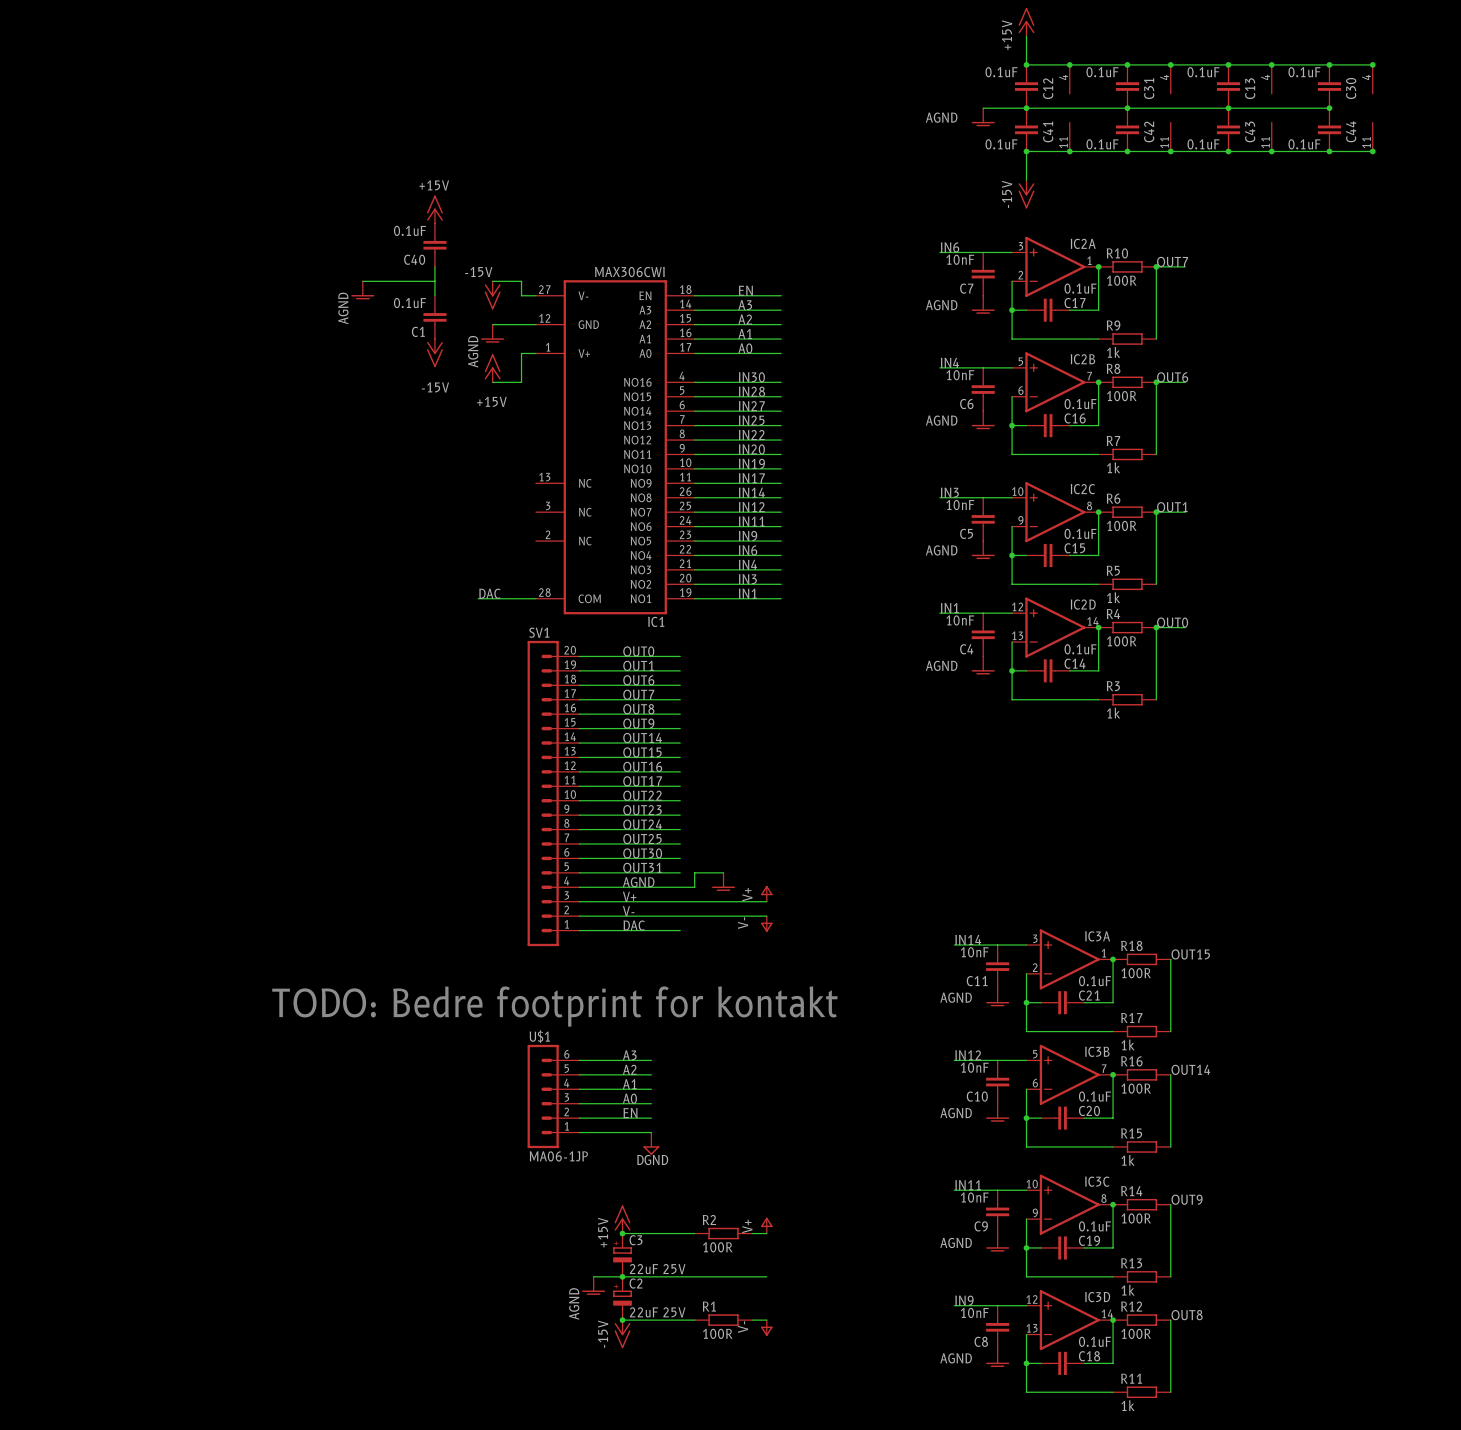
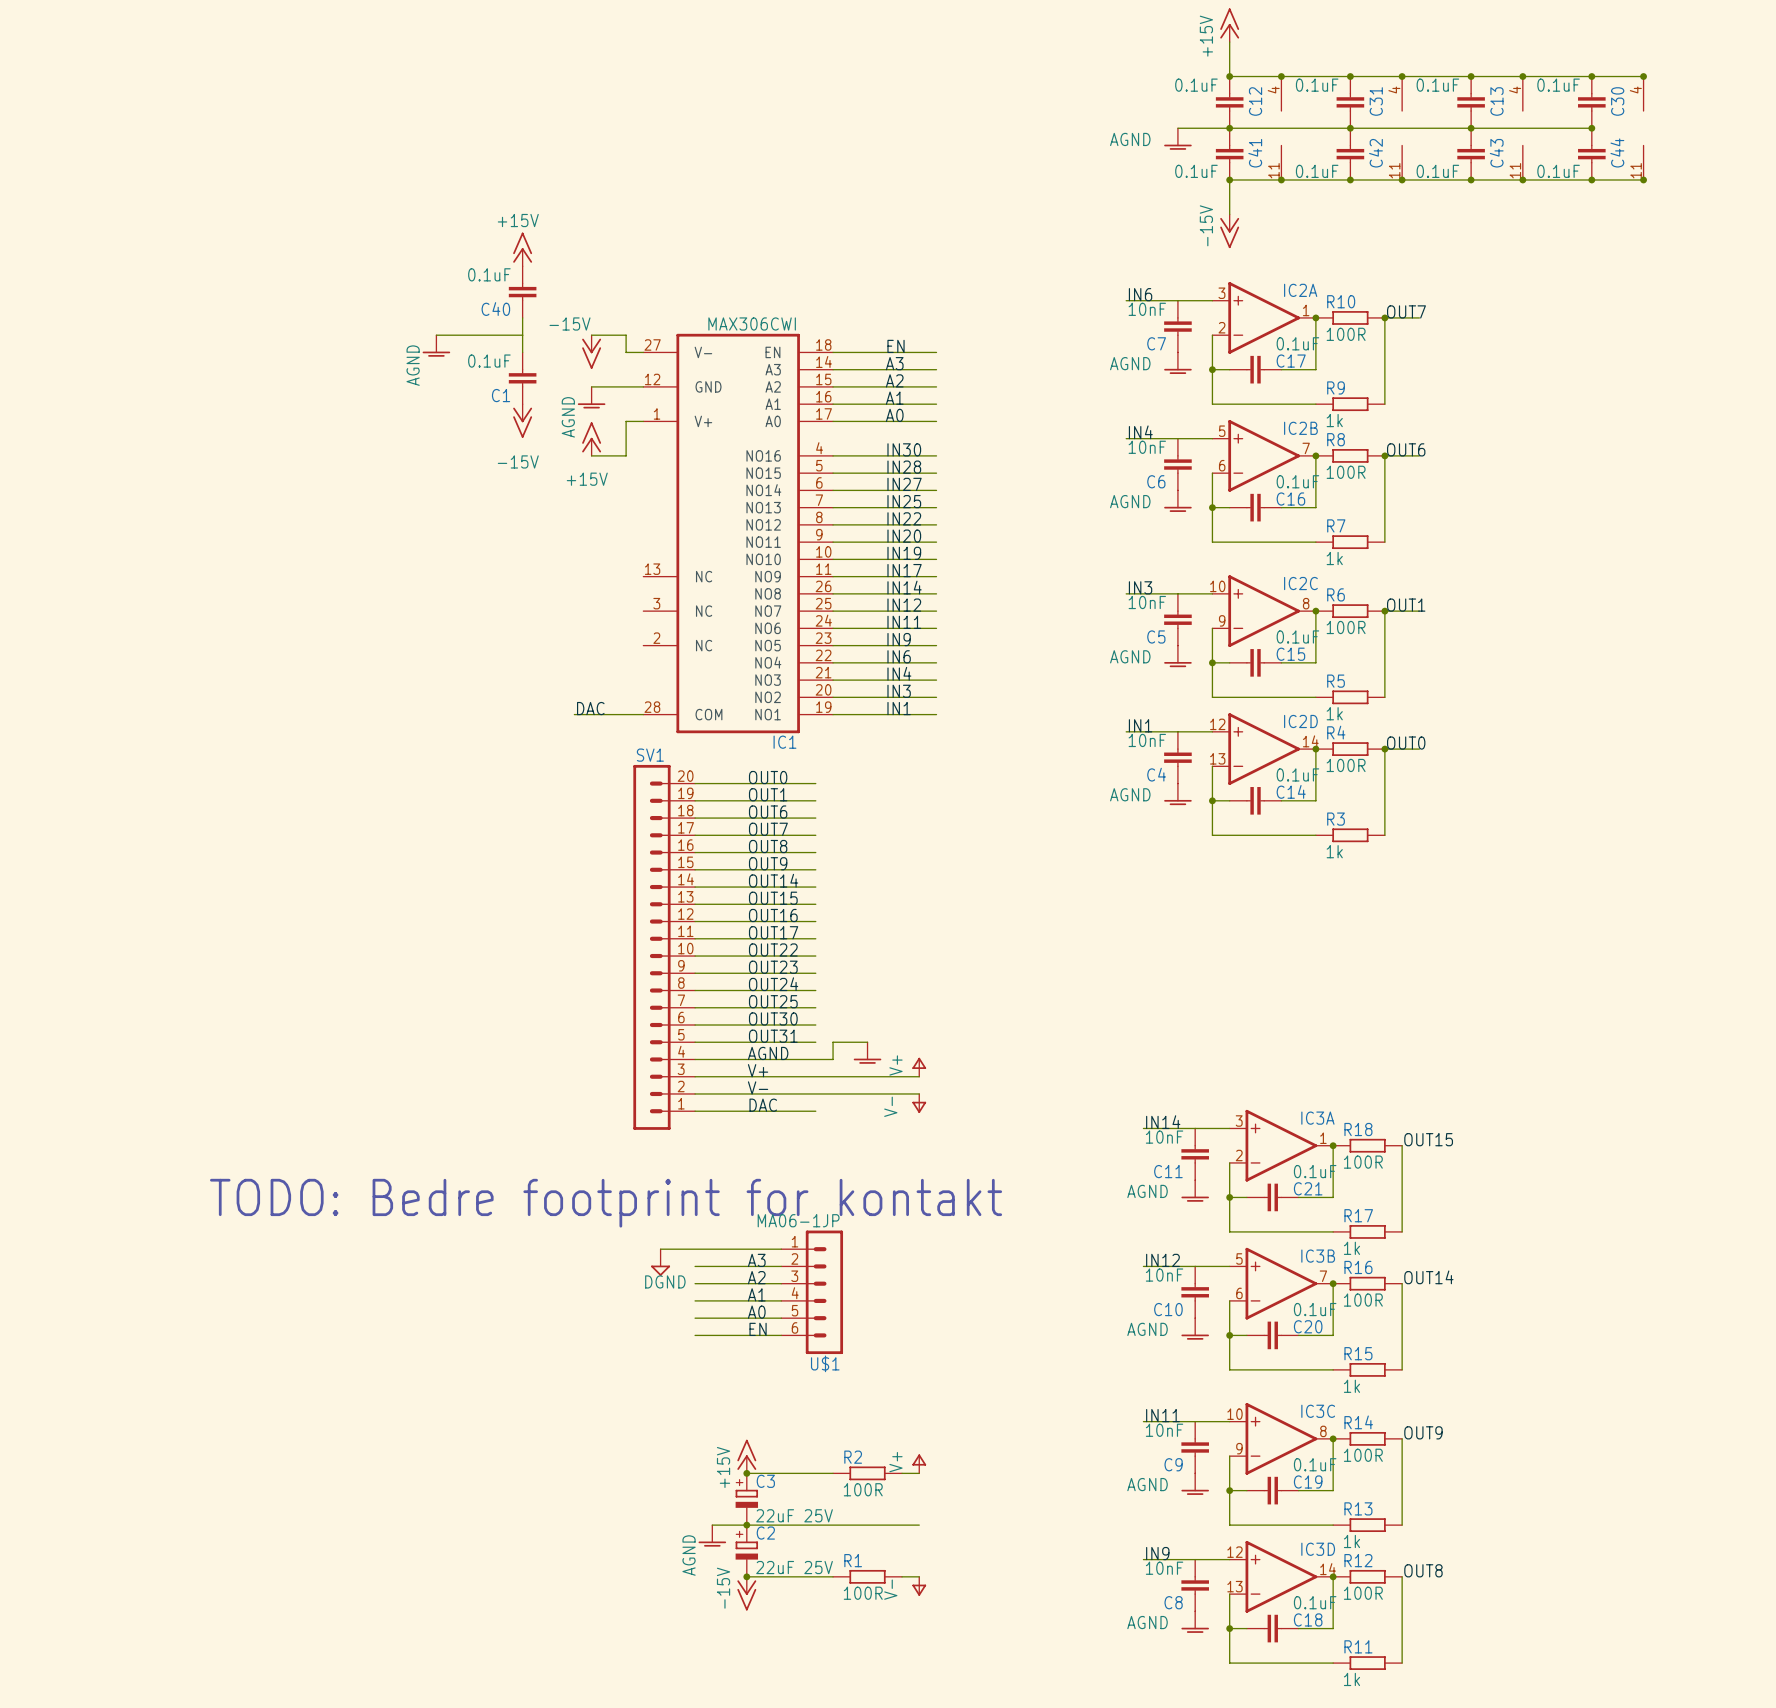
wire: none -> (660, 1249) (781, 1249)
U$1 rotation: 0° (543, 1096) -> 180° (824, 1292)
U$1 position: (553, 1096) -> (812, 1292)
wire: (579, 1132) (651, 1132) -> none
power symbol position: DGND (651, 1143) -> DGND (660, 1262)

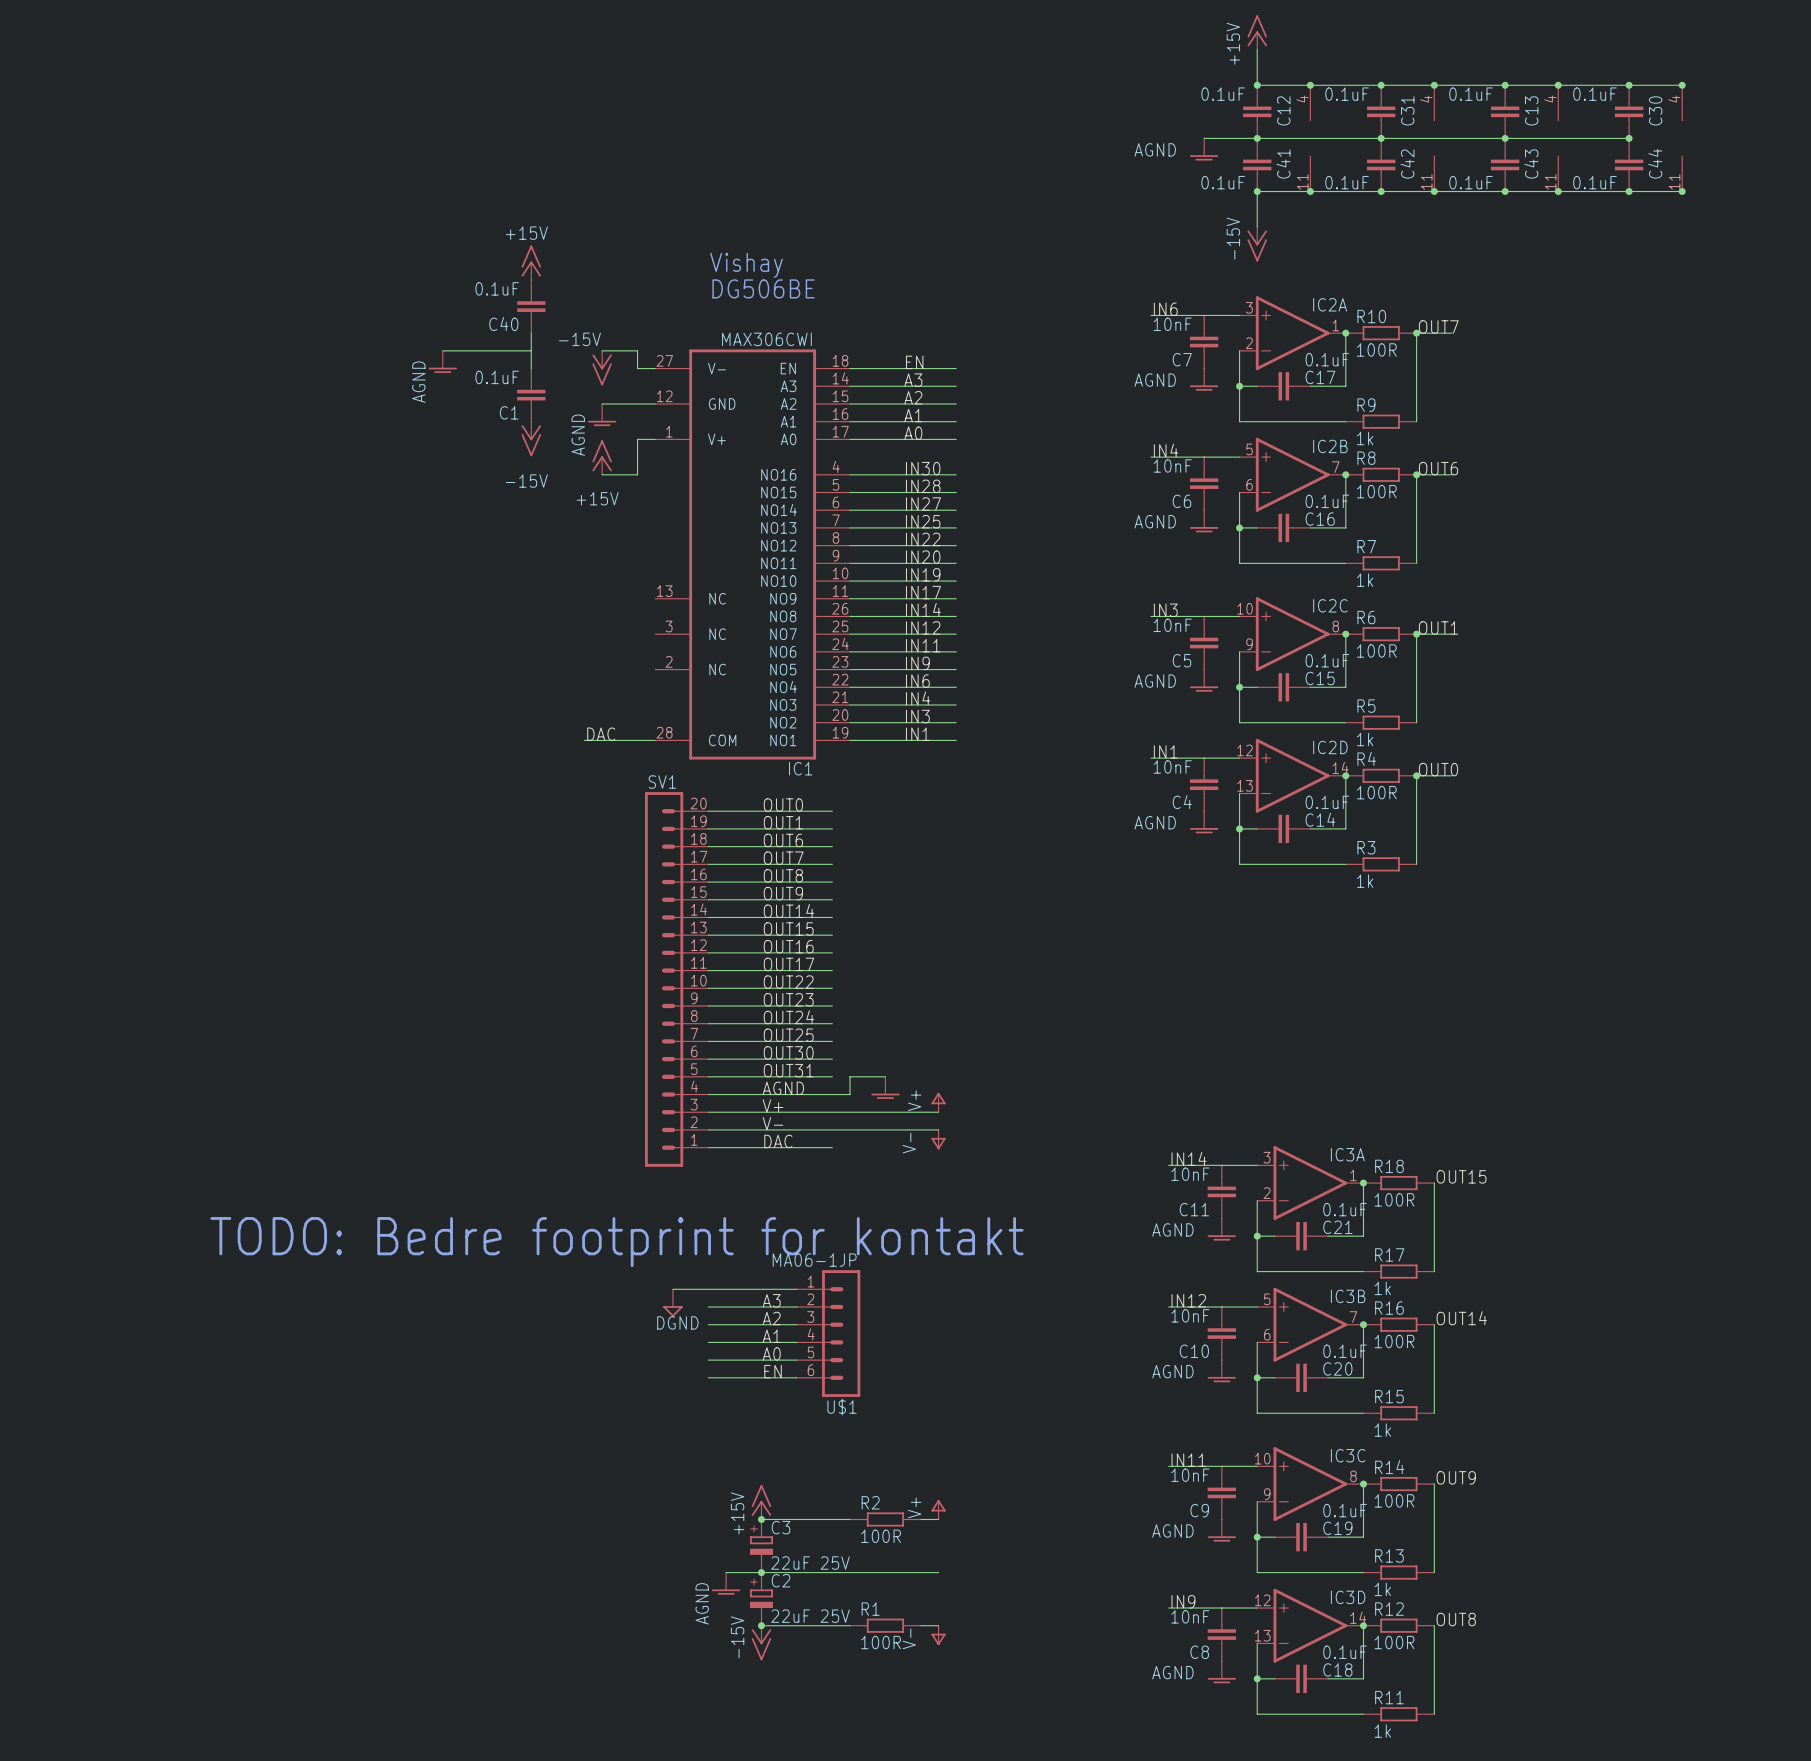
text: none -> Vishay (746, 265)
text: none -> DG506BE (763, 288)

